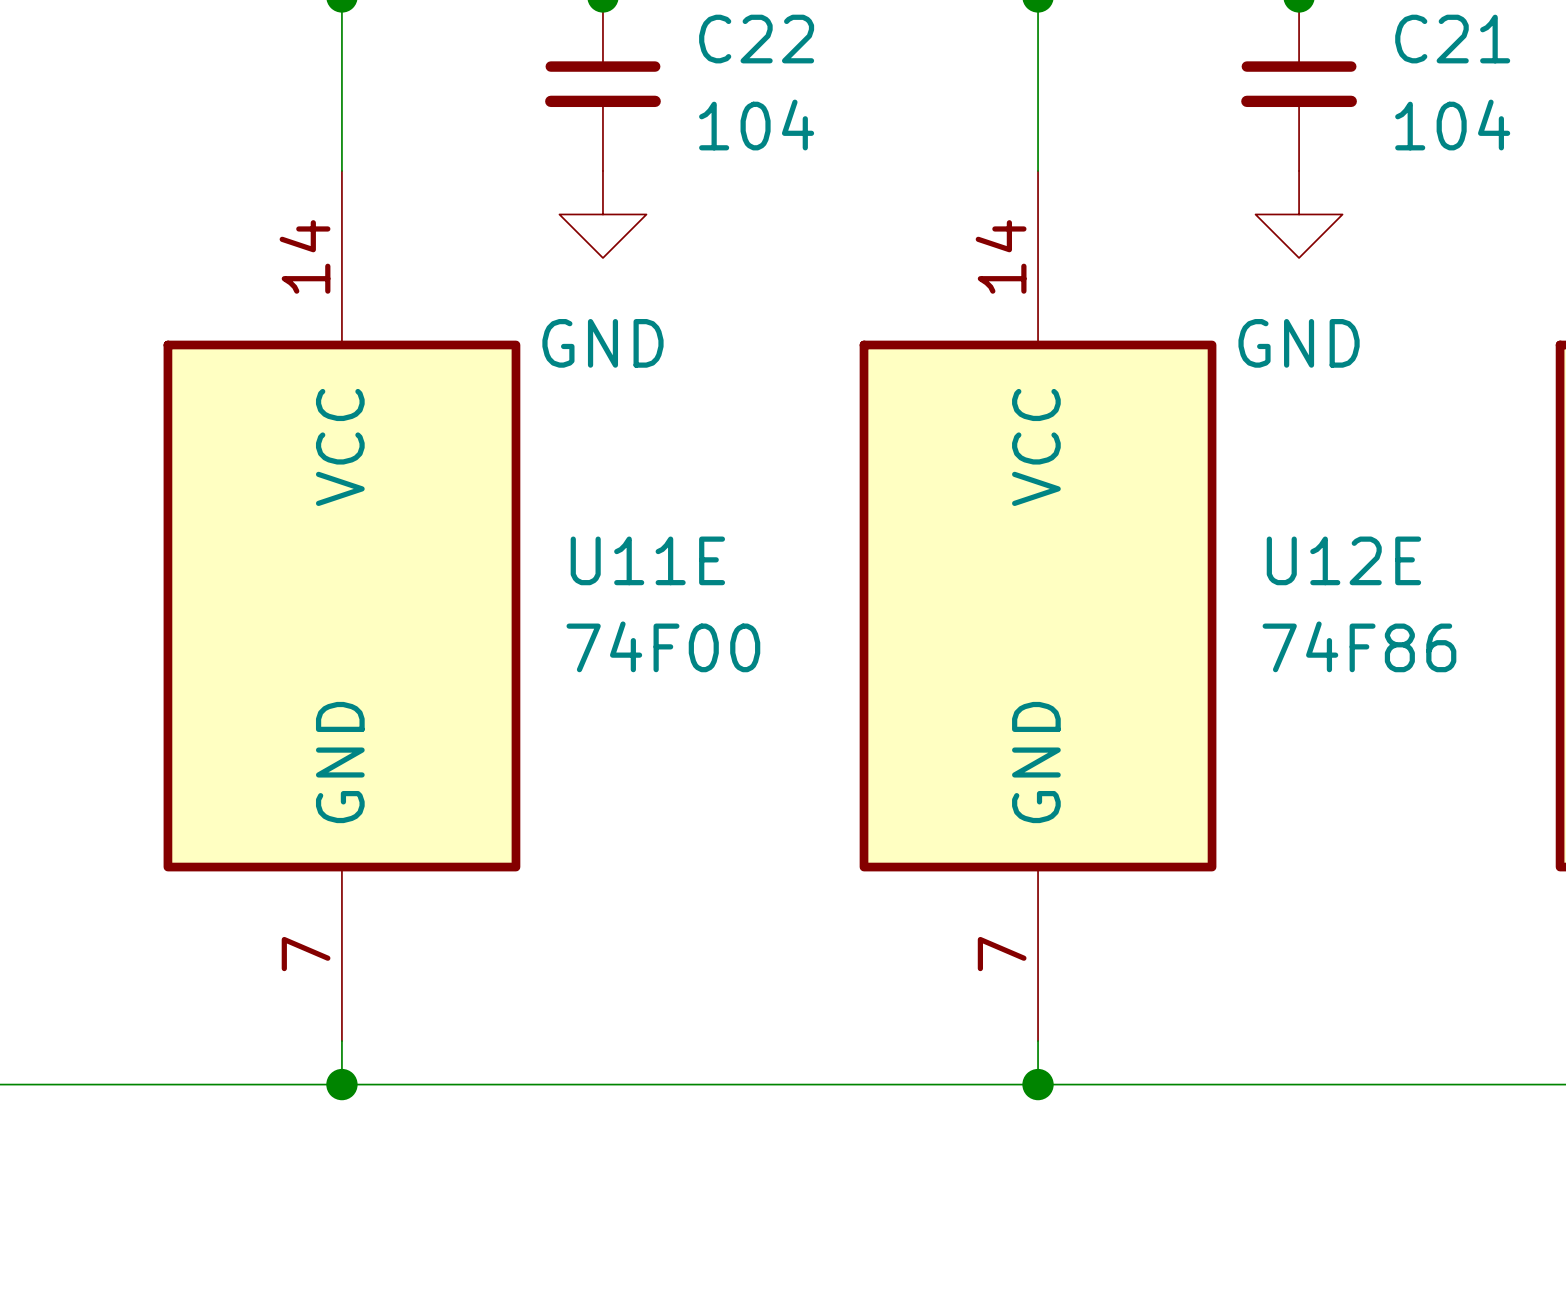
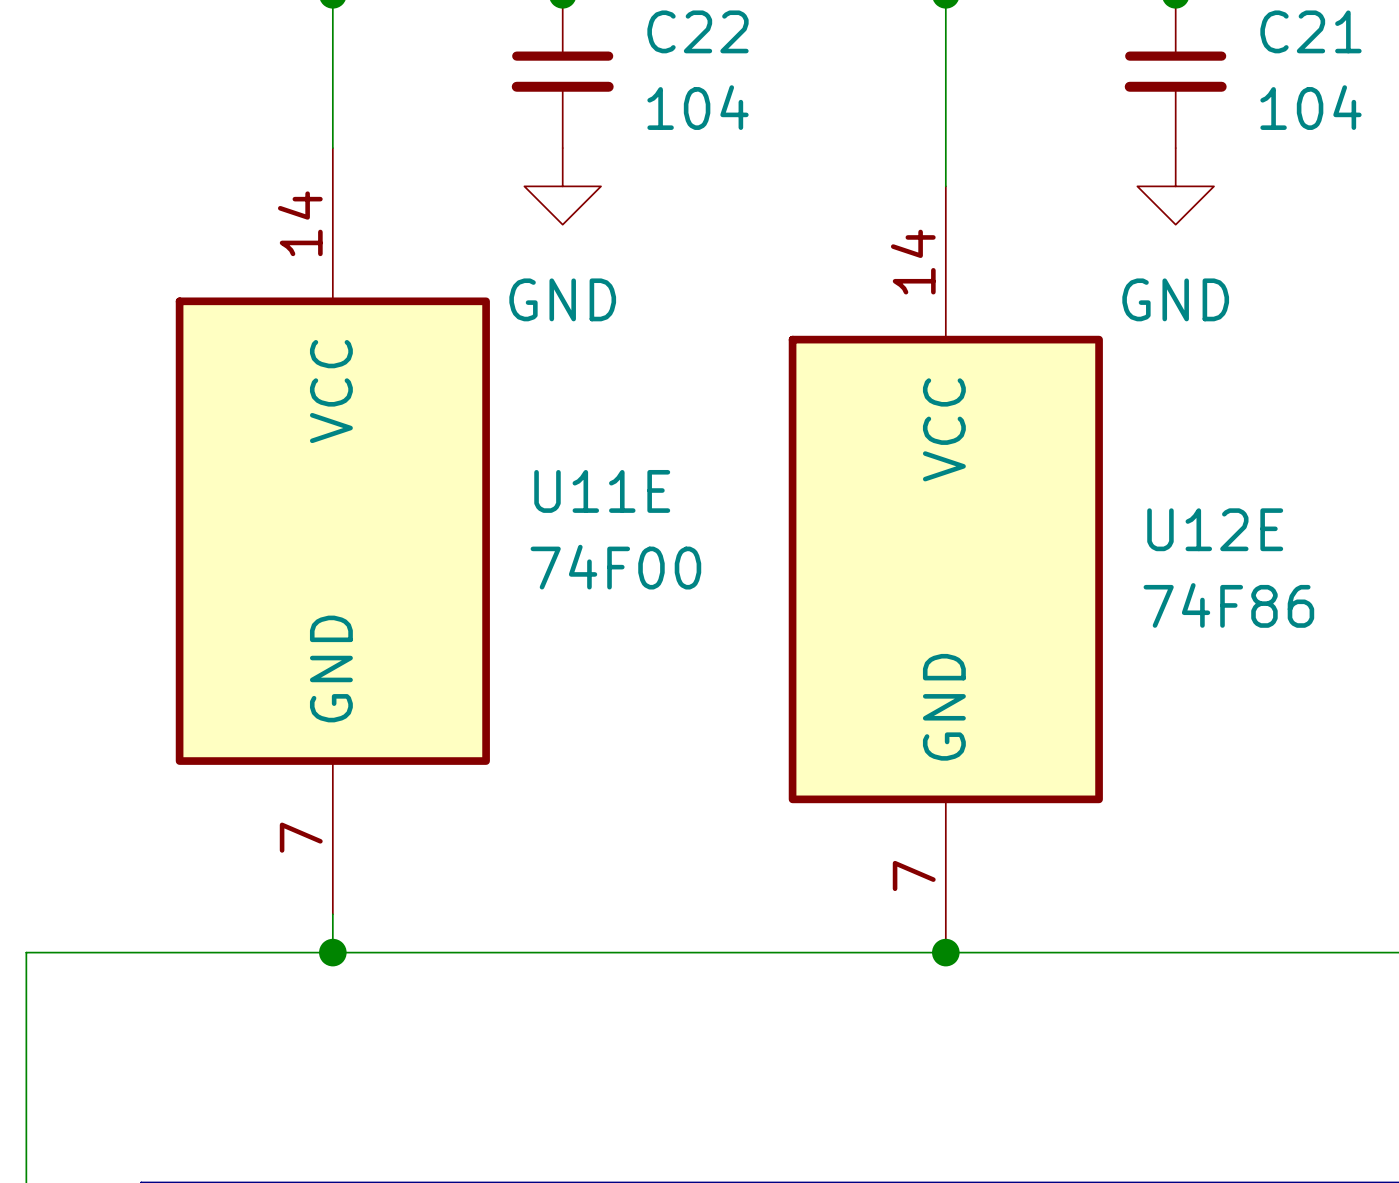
U12E position: (1038, 606) -> (945, 569)

